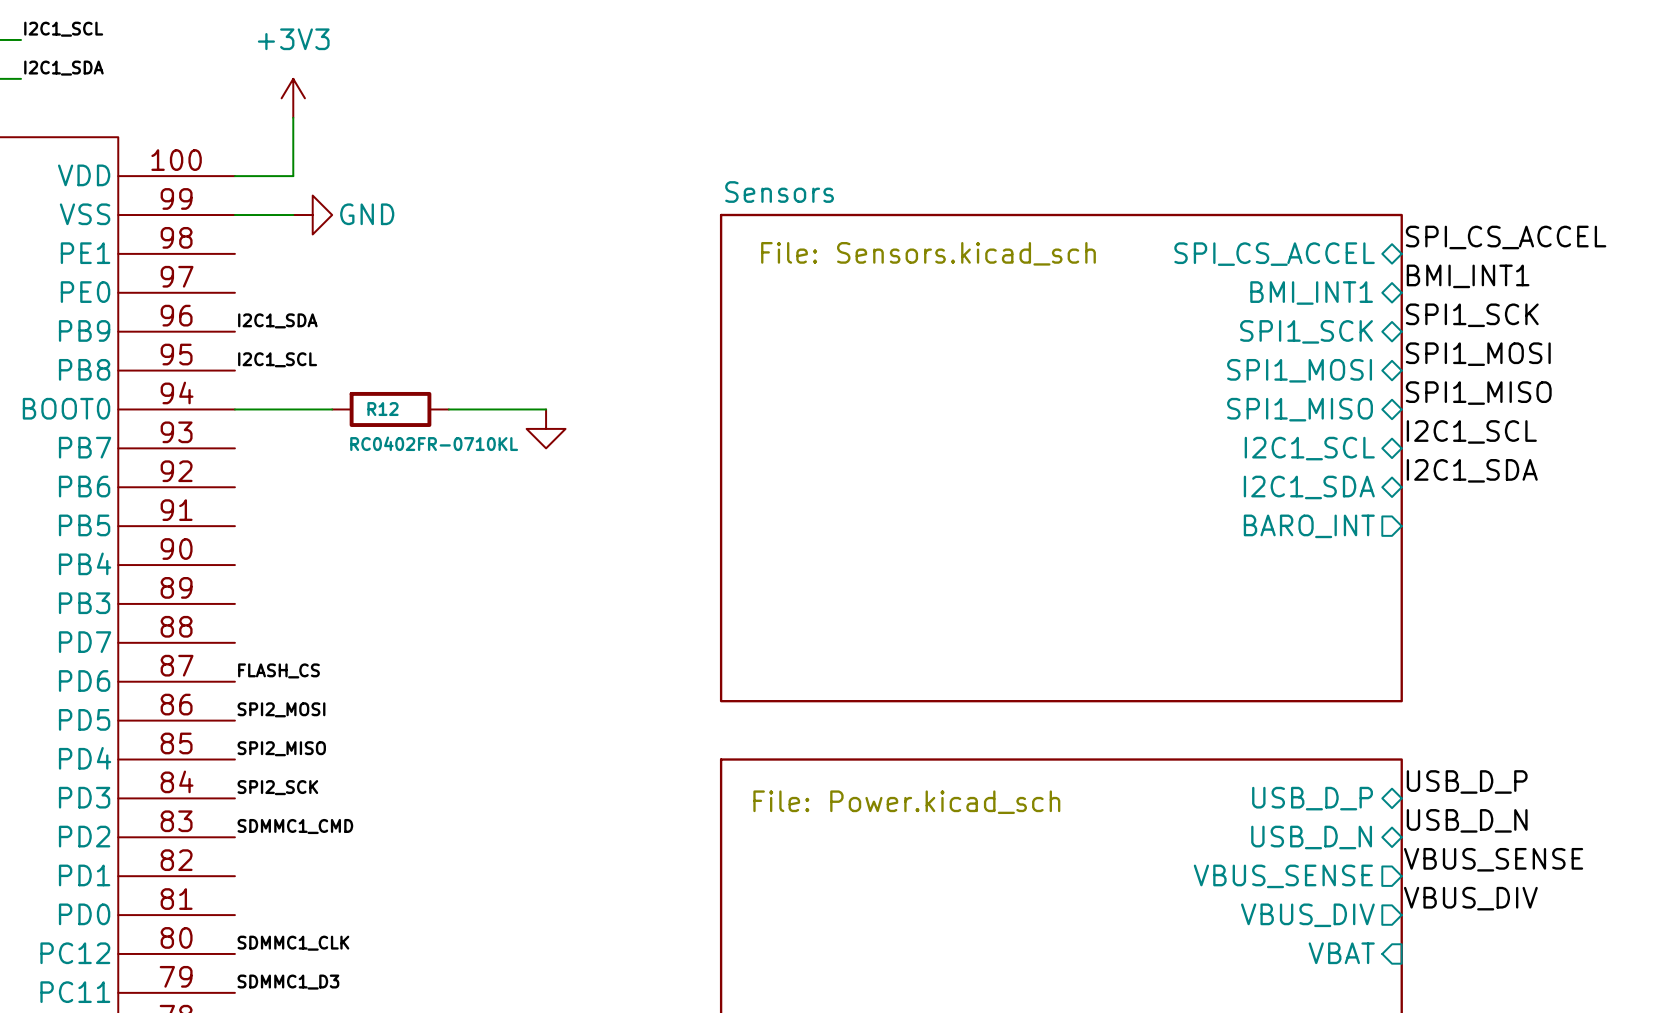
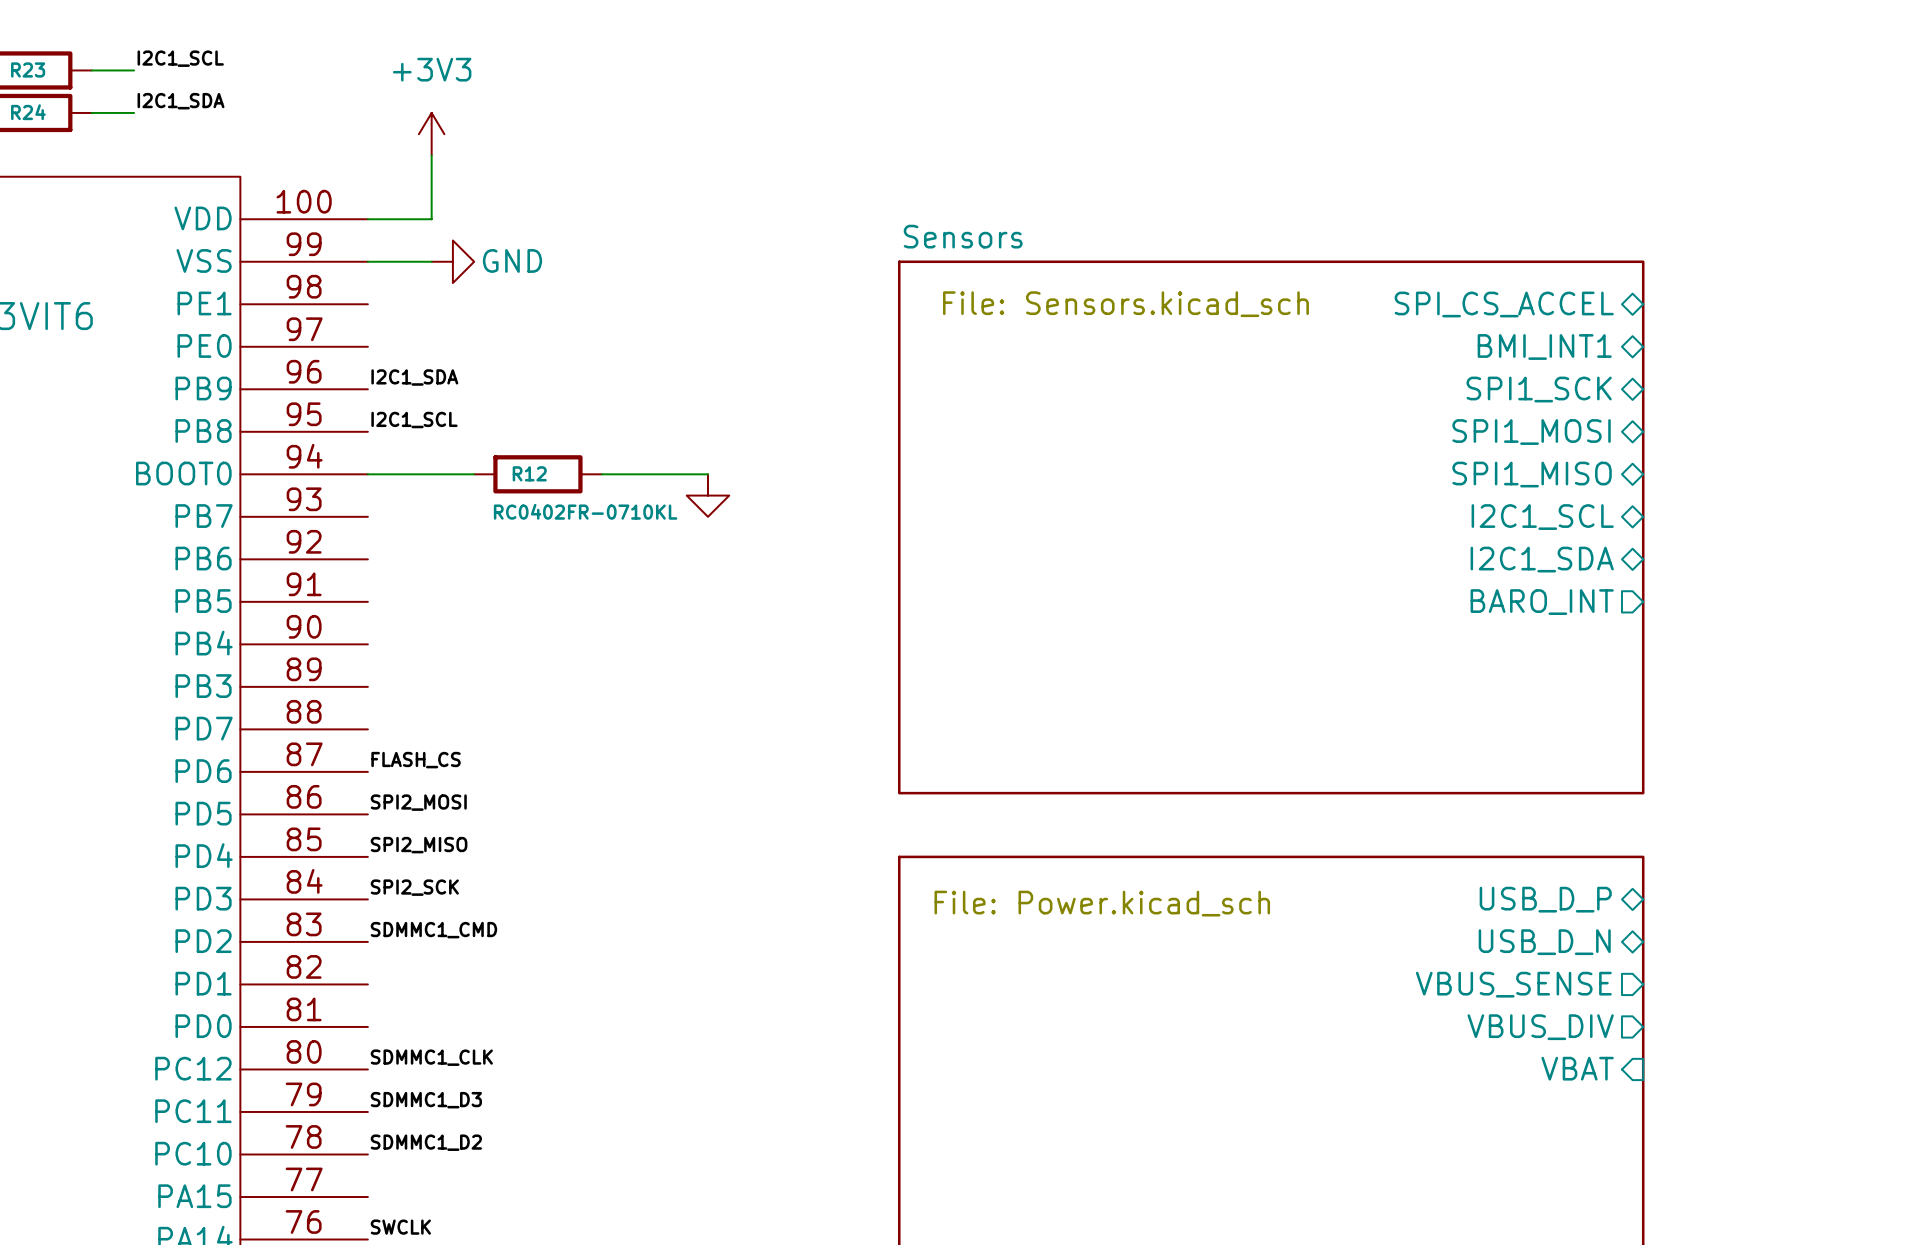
label: SPI_CS_ACCEL (1506, 237) -> none
label: BMI_INT1 (1468, 276) -> none
label: SPI1_SCK (1472, 315) -> none
label: SPI1_MOSI (1478, 354) -> none
label: SPI1_MISO (1478, 393) -> none
label: I2C1_SCL (1471, 431) -> none
label: I2C1_SDA (1472, 470) -> none
label: USB_D_P (1467, 781) -> none
label: USB_D_N (1467, 820) -> none
label: VBUS_SENSE (1493, 859) -> none
label: VBUS_DIV (1470, 898) -> none

